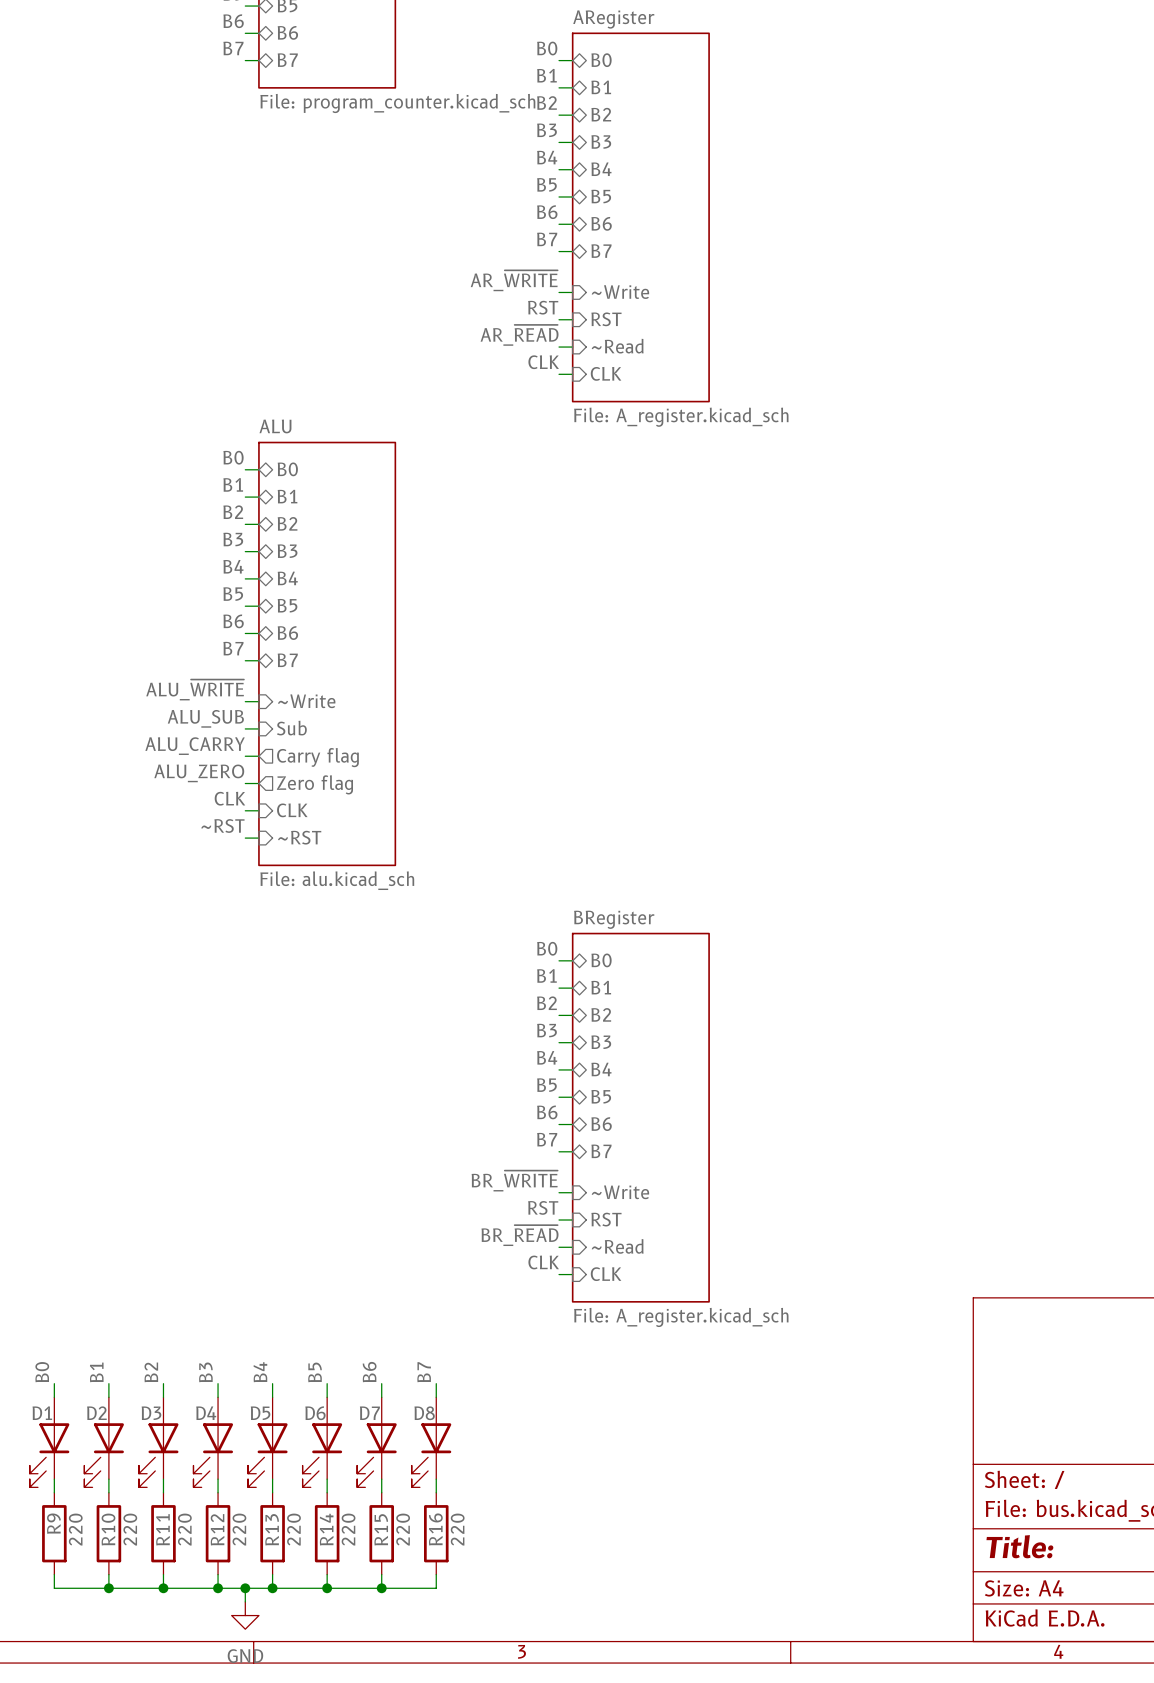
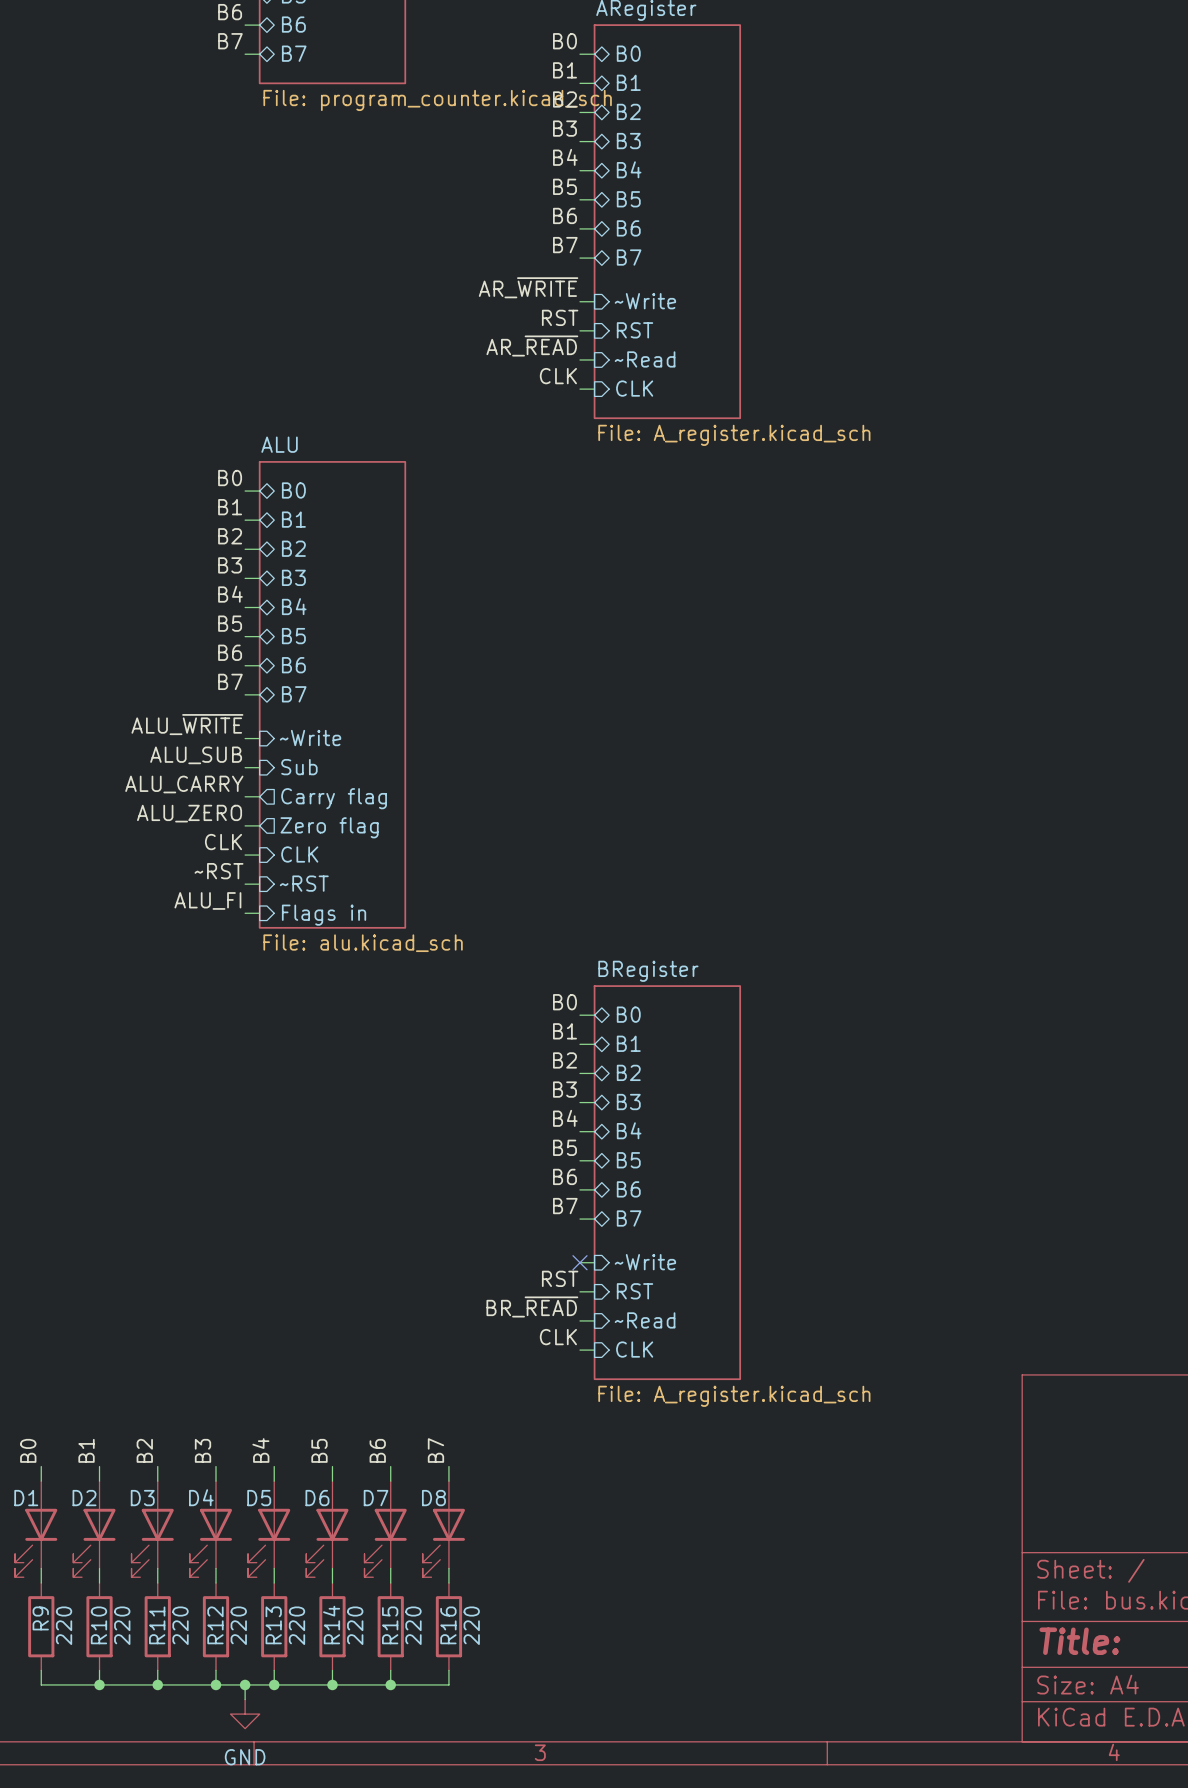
sheet ALU shape: [258, 441, 397, 867] -> [258, 461, 407, 929]
label: none -> ALU_FI (207, 900)
wire: none -> (245, 913) (259, 913)
sheet pin: none -> Flags in (324, 915)
label: BR_~{WRITE} (514, 1181) -> none
no-connect mark: none -> (580, 1262)

